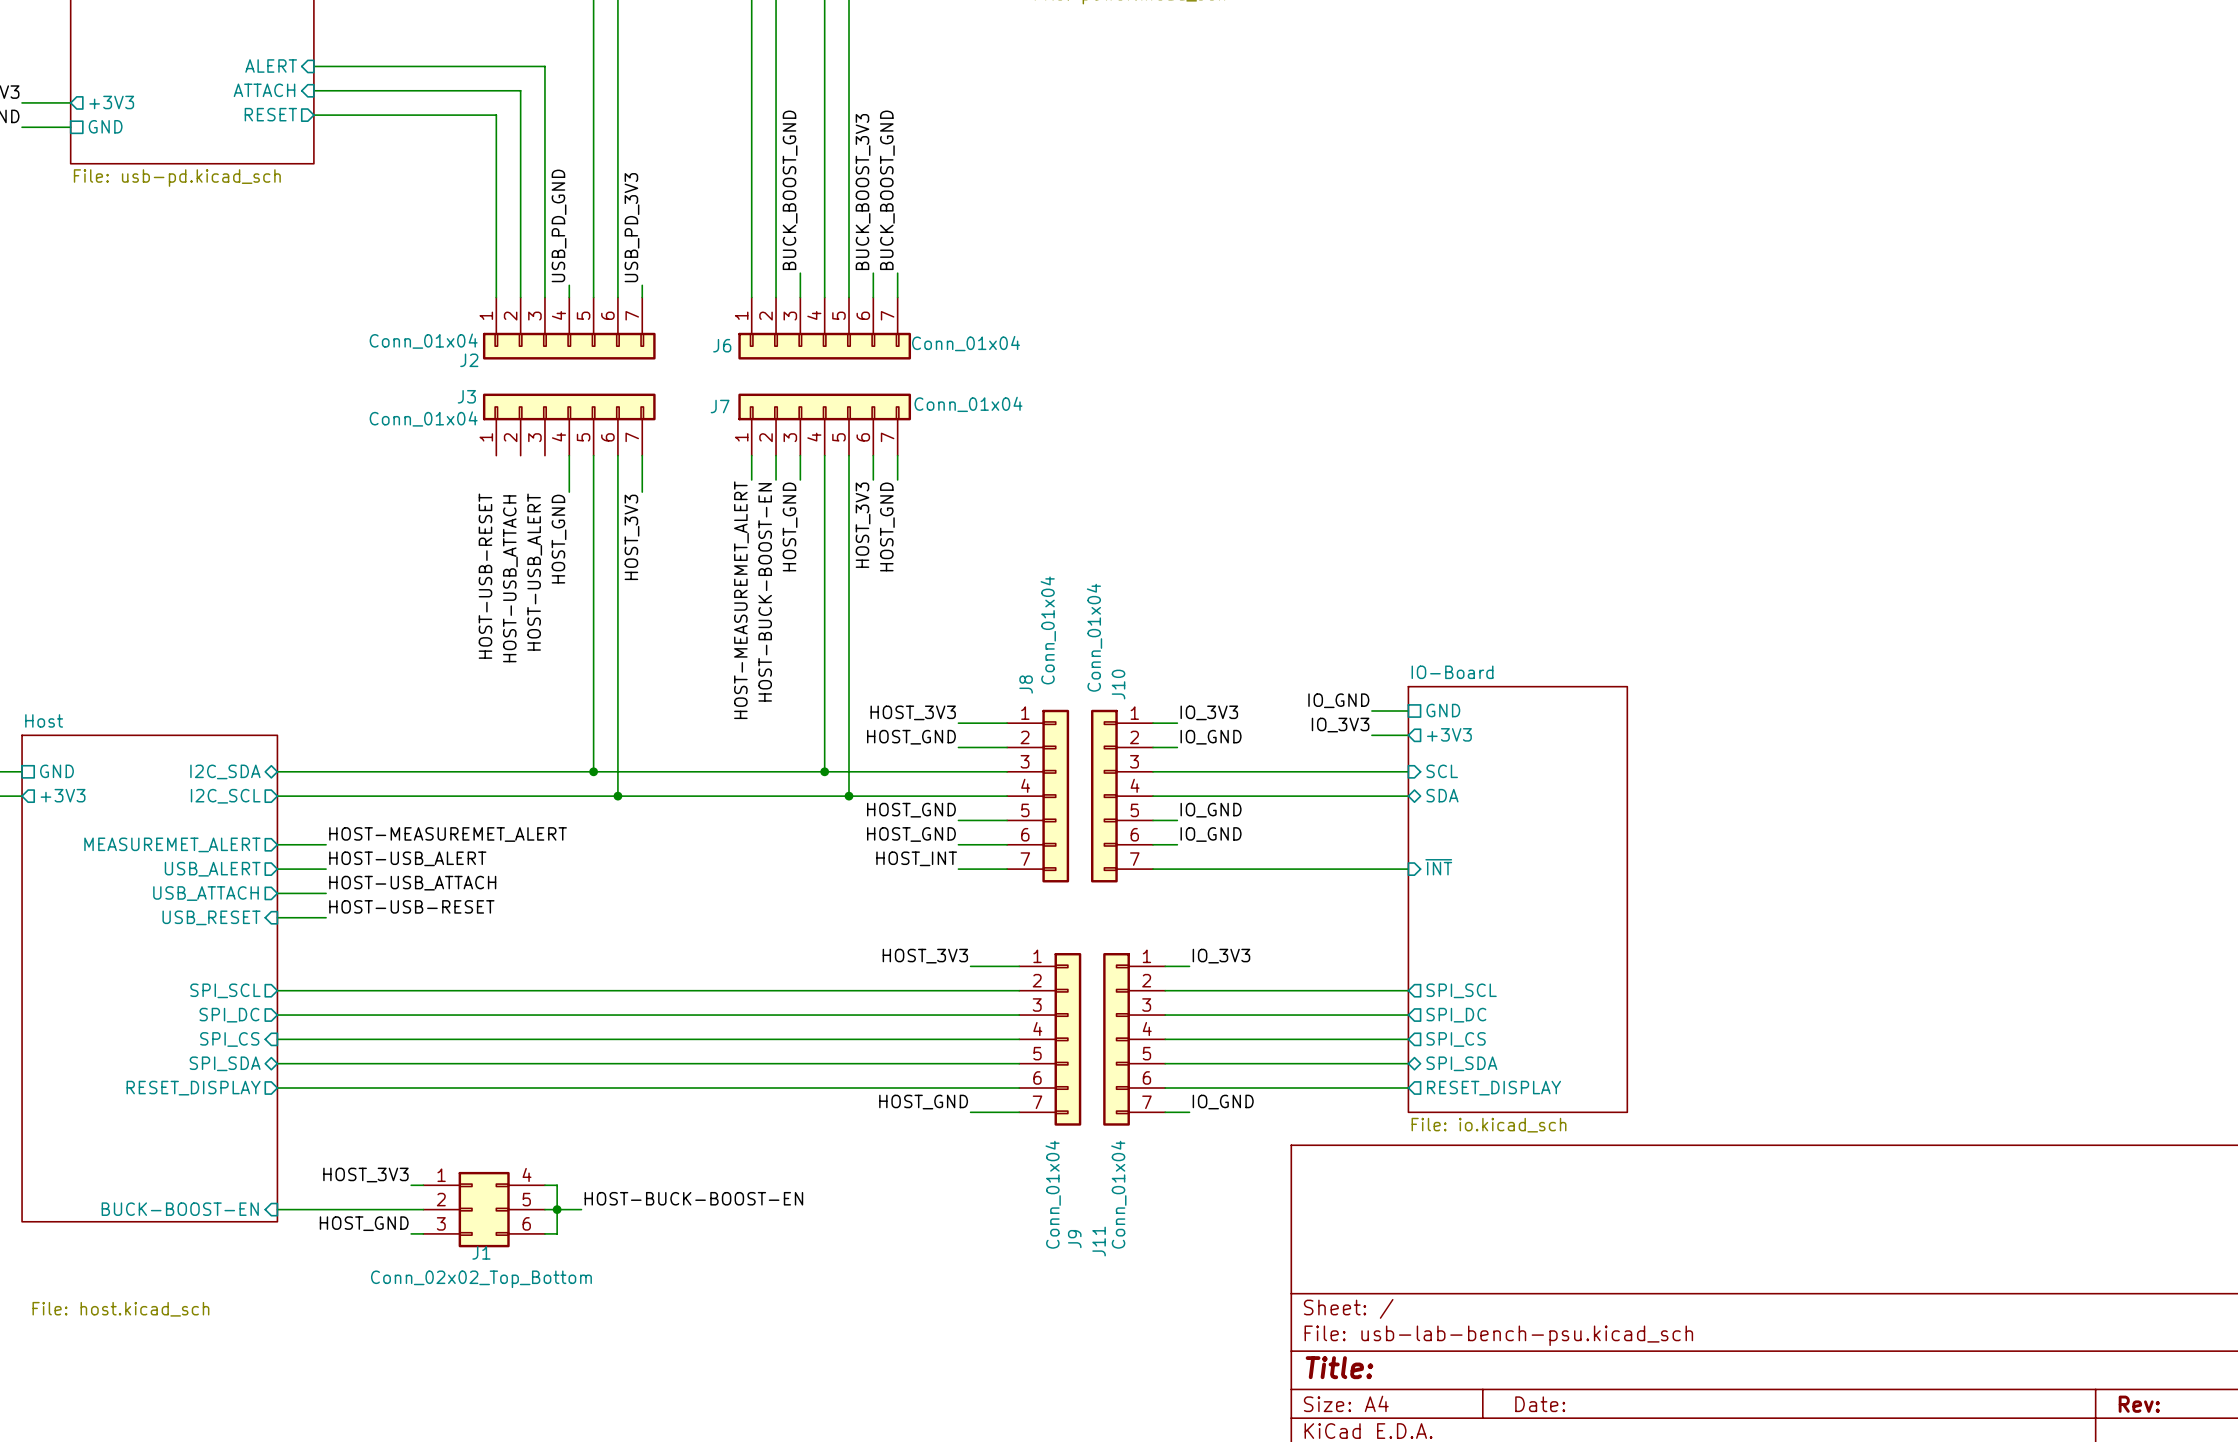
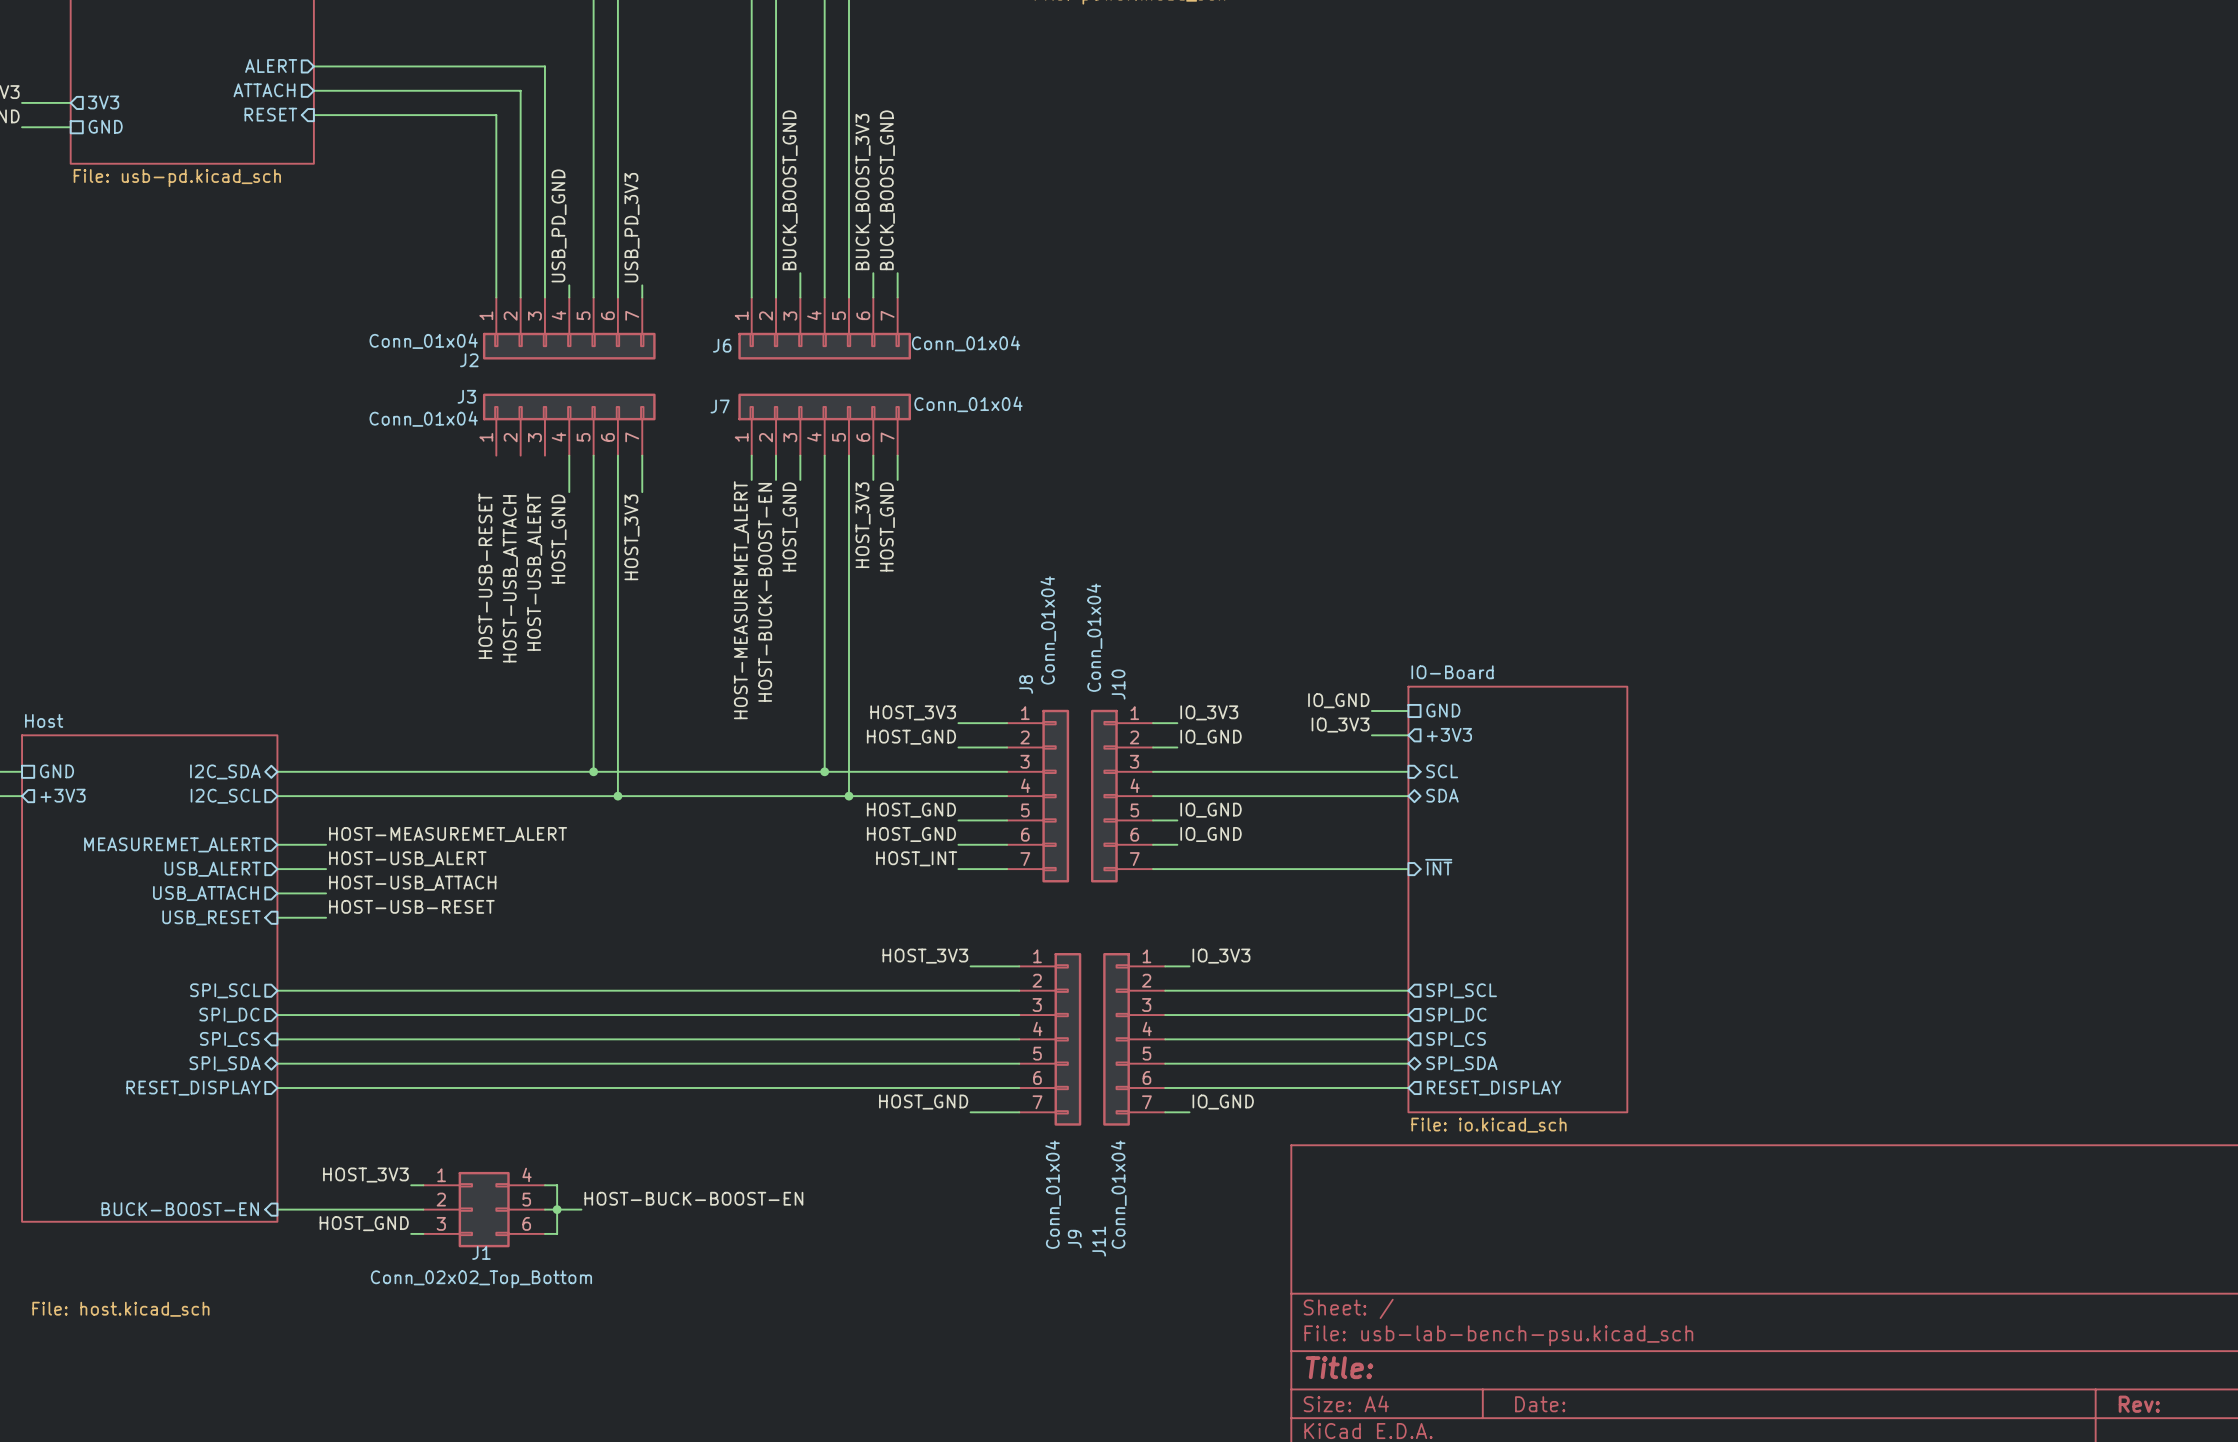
sheet pin shape: input (271, 66) -> output (271, 66)
sheet pin shape: input (264, 90) -> output (264, 90)
sheet pin: +3V3 (111, 102) -> 3V3 (103, 102)
sheet pin shape: output (270, 114) -> input (270, 114)

